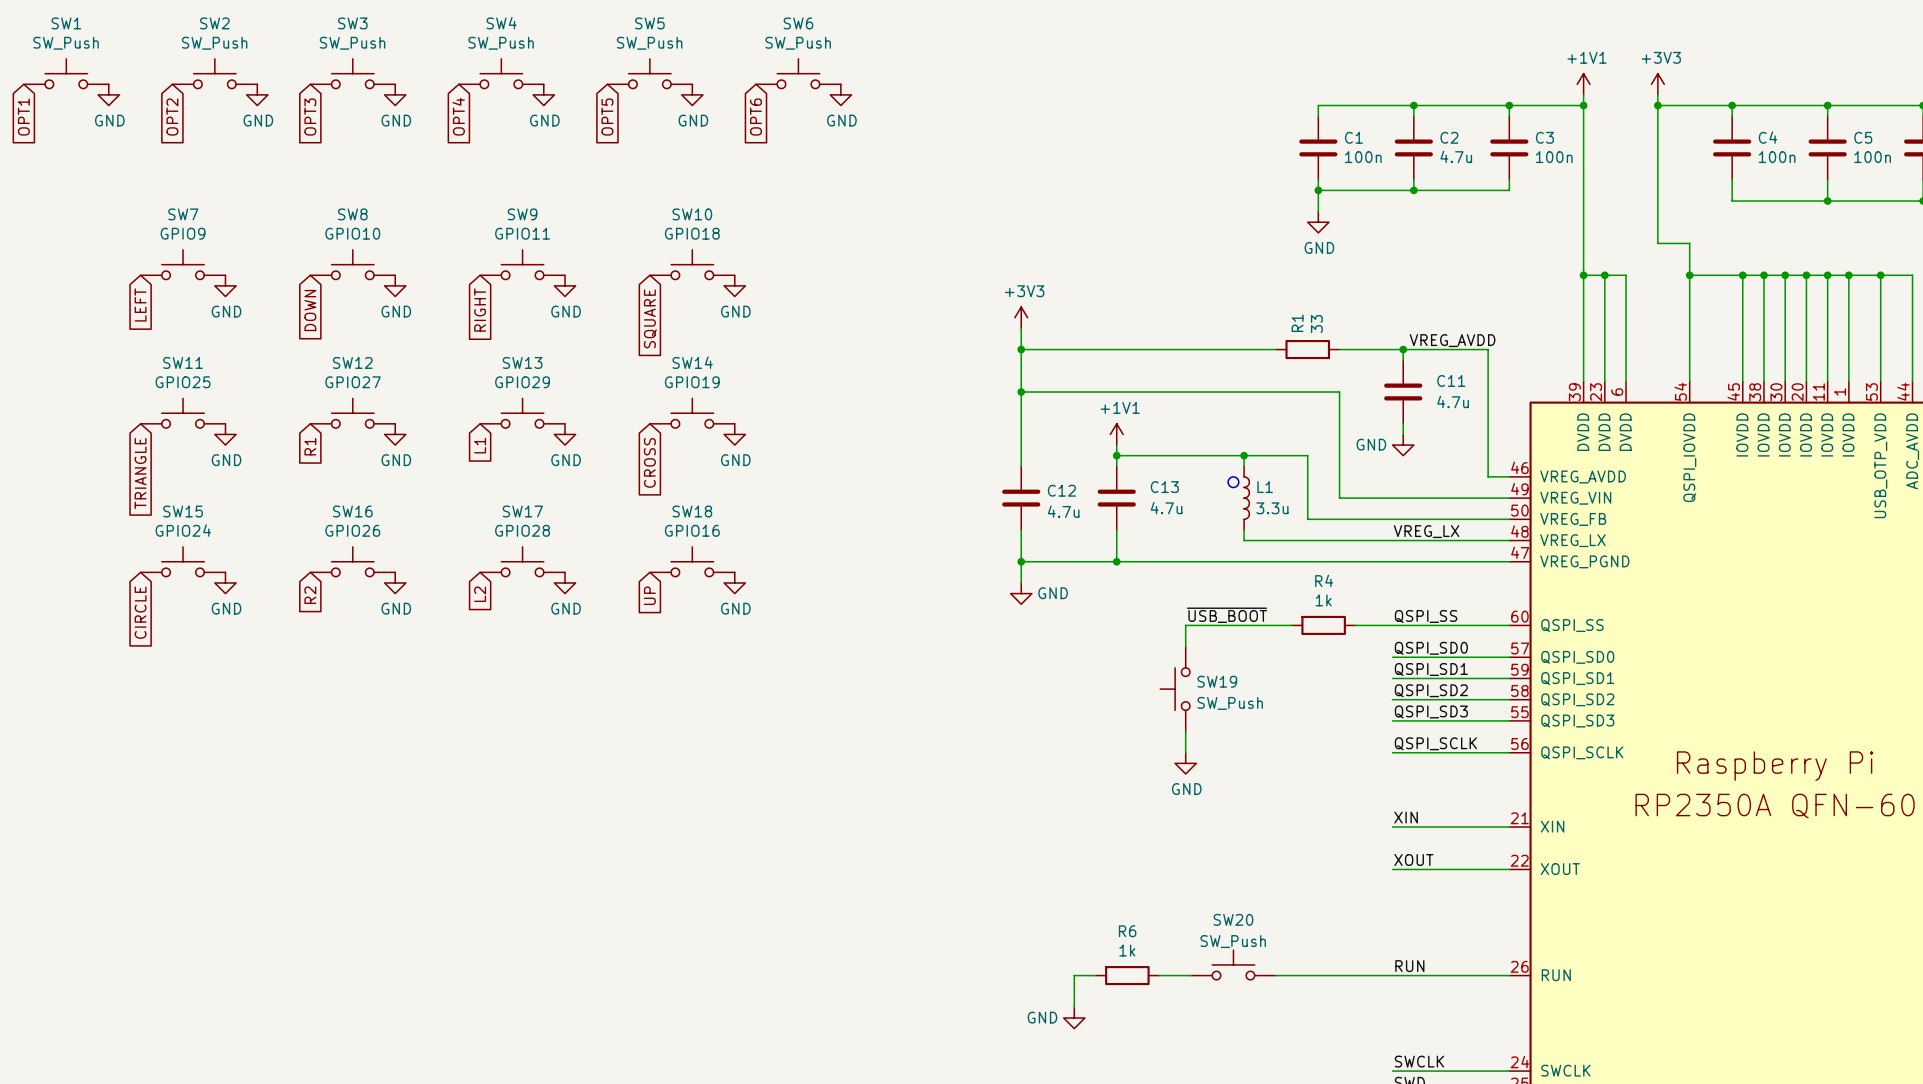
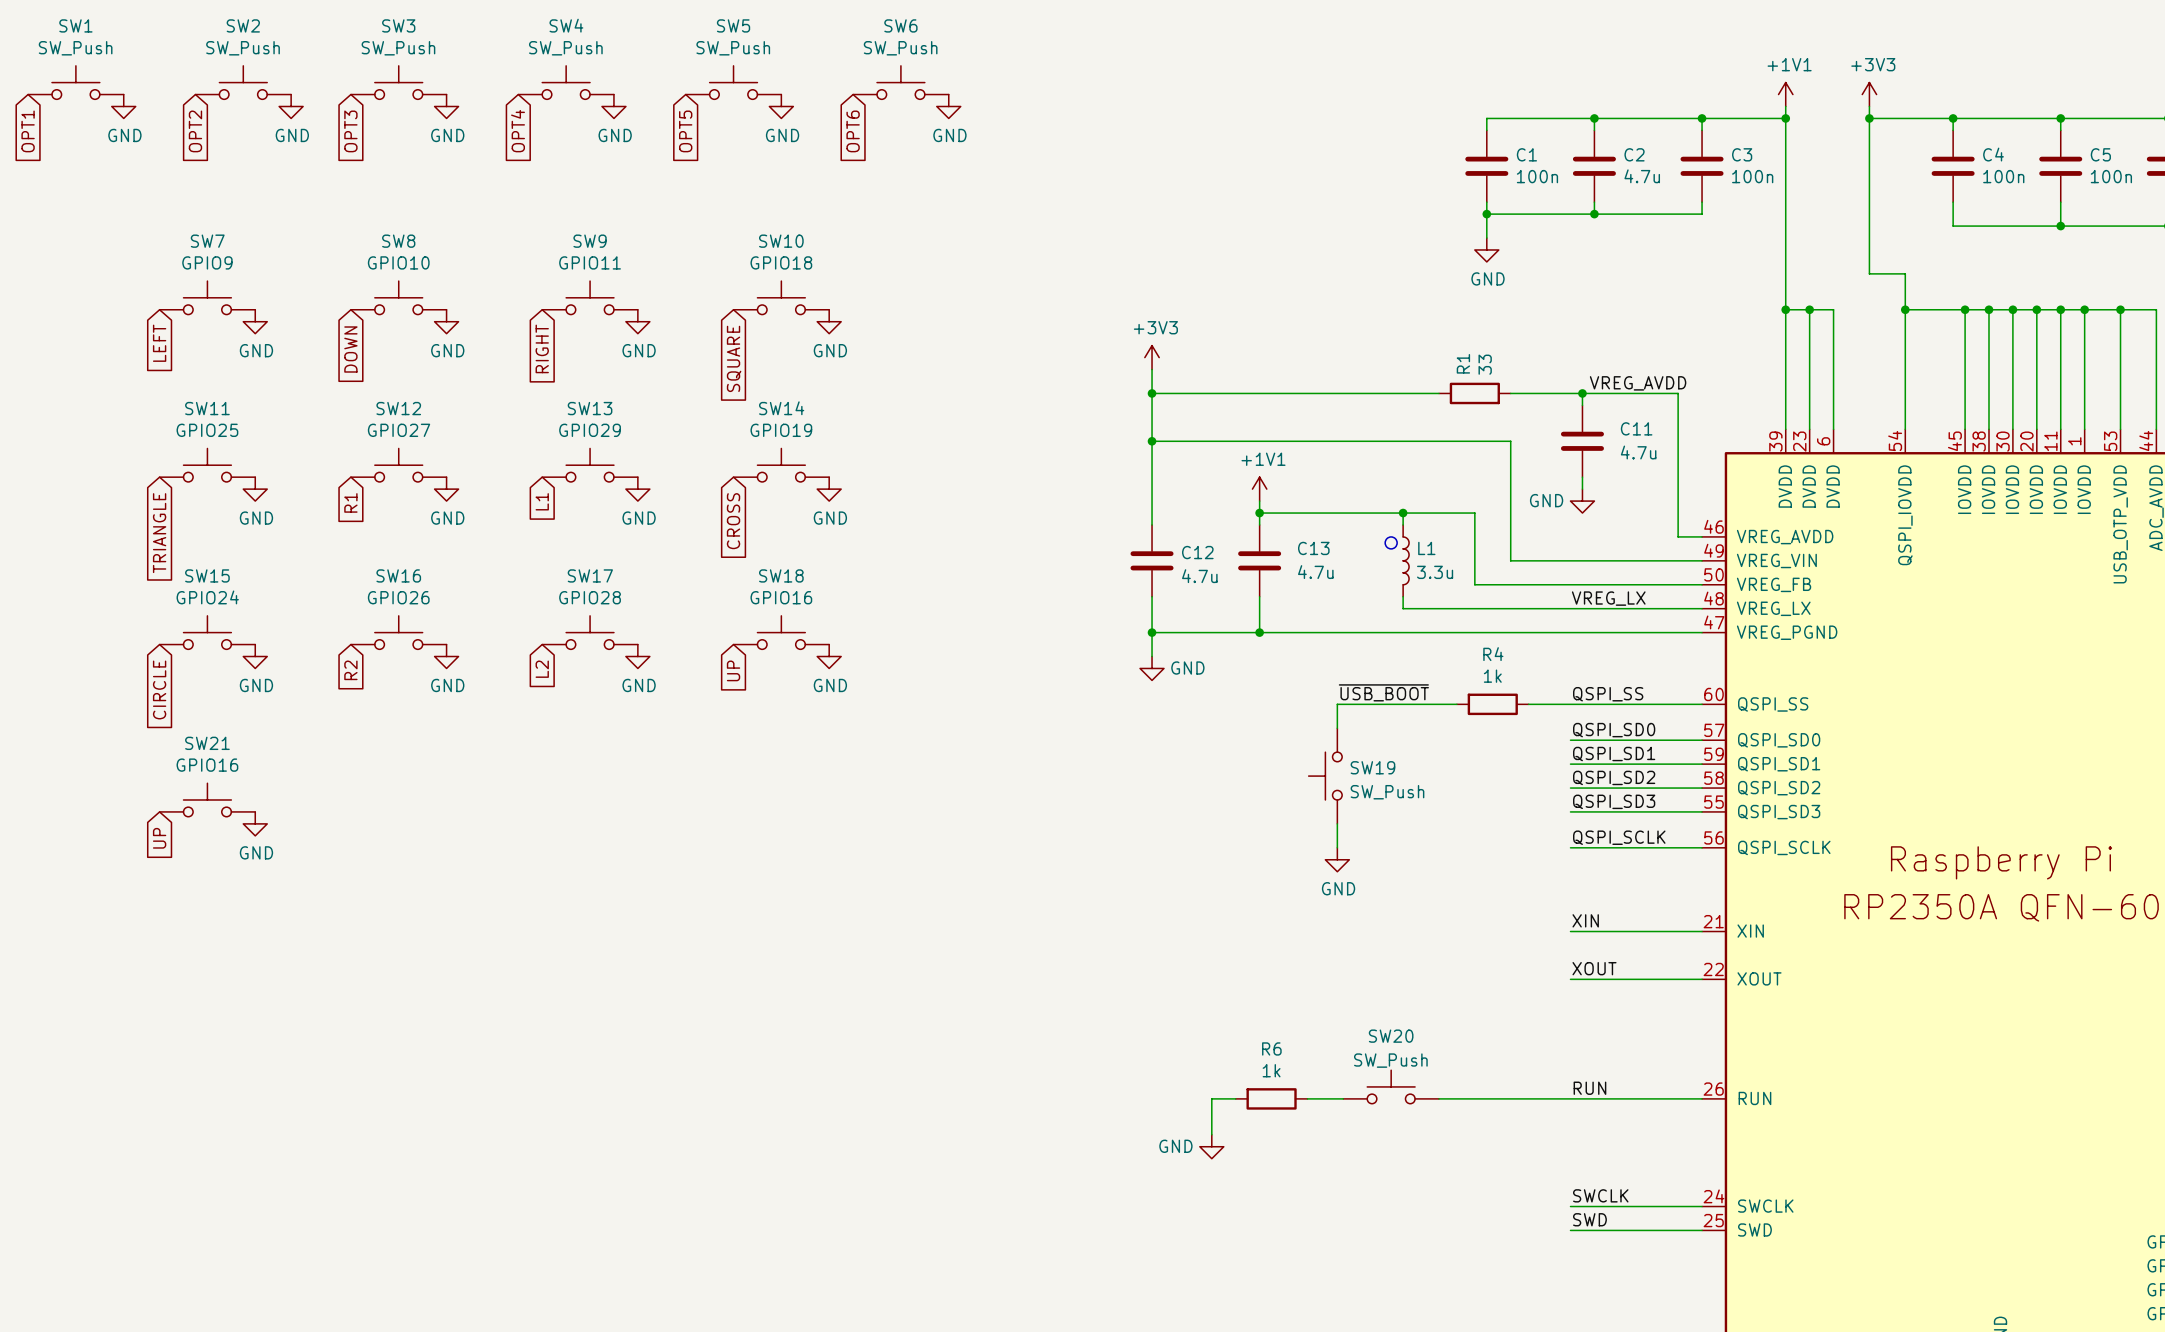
SW21: none -> GPIO16 (207, 799)
power symbol: none -> GND (255, 823)
global label: none -> UP (159, 838)

